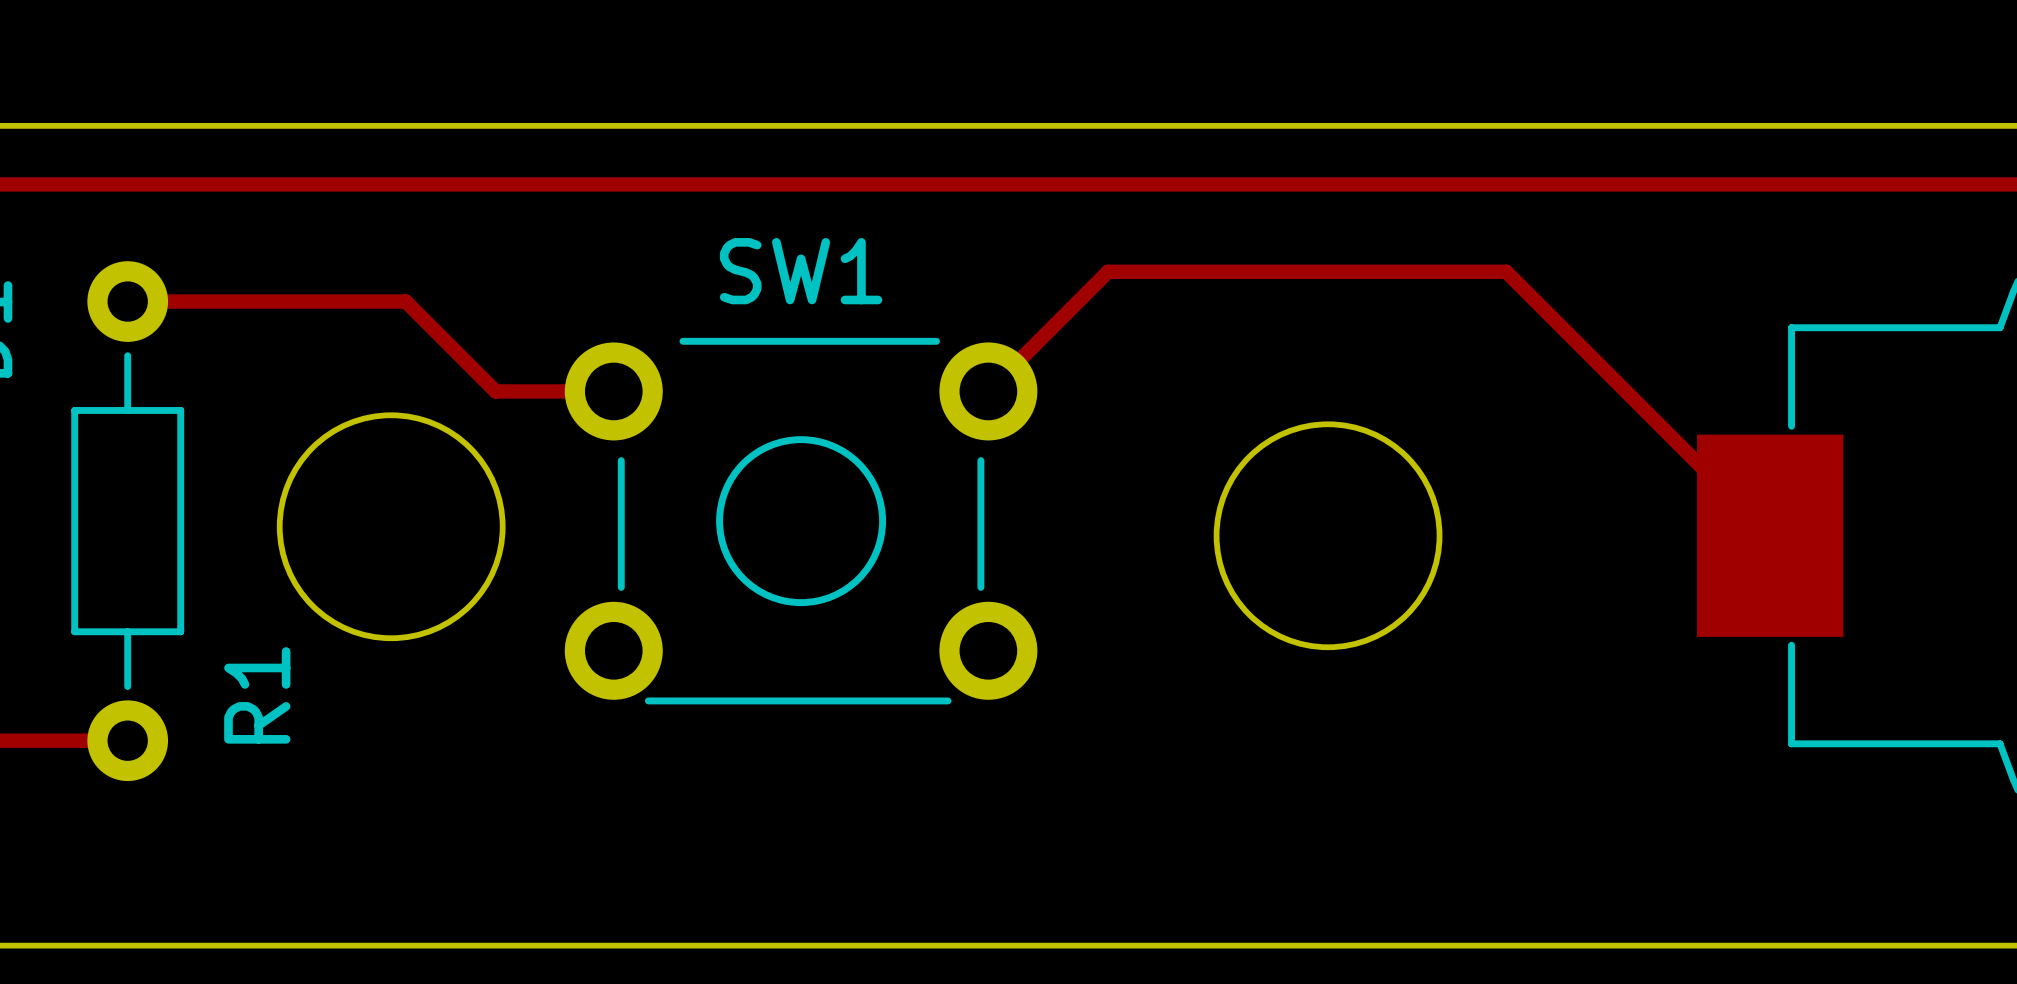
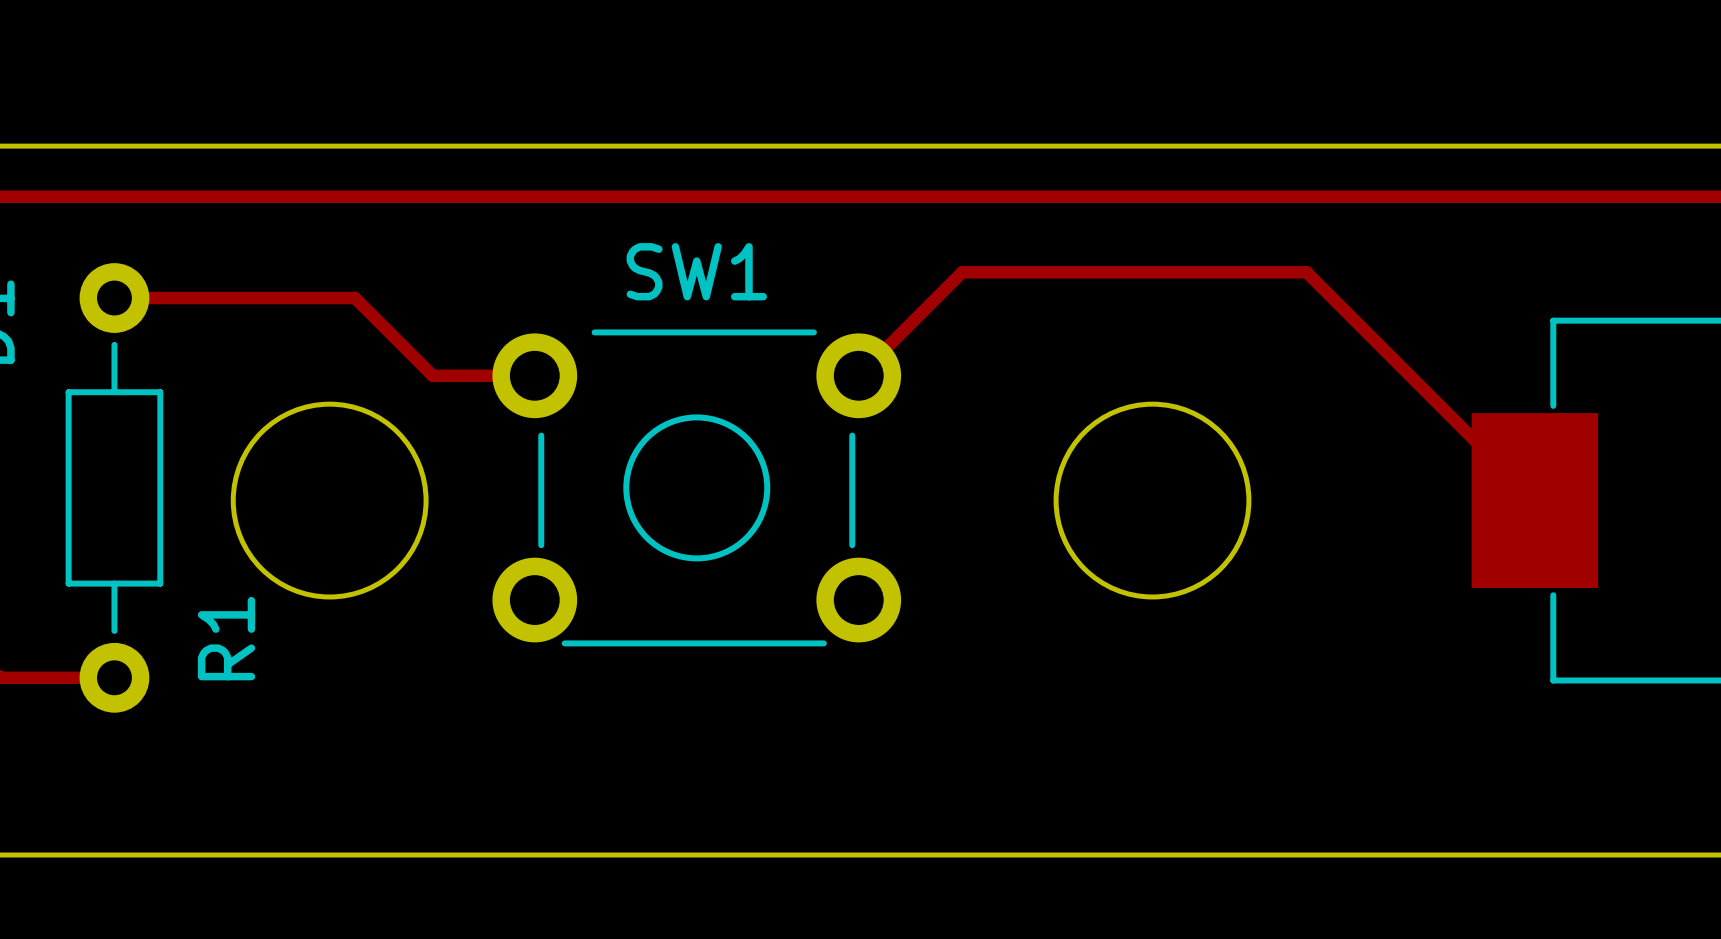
round board edge position: (391, 526) -> (329, 500)

